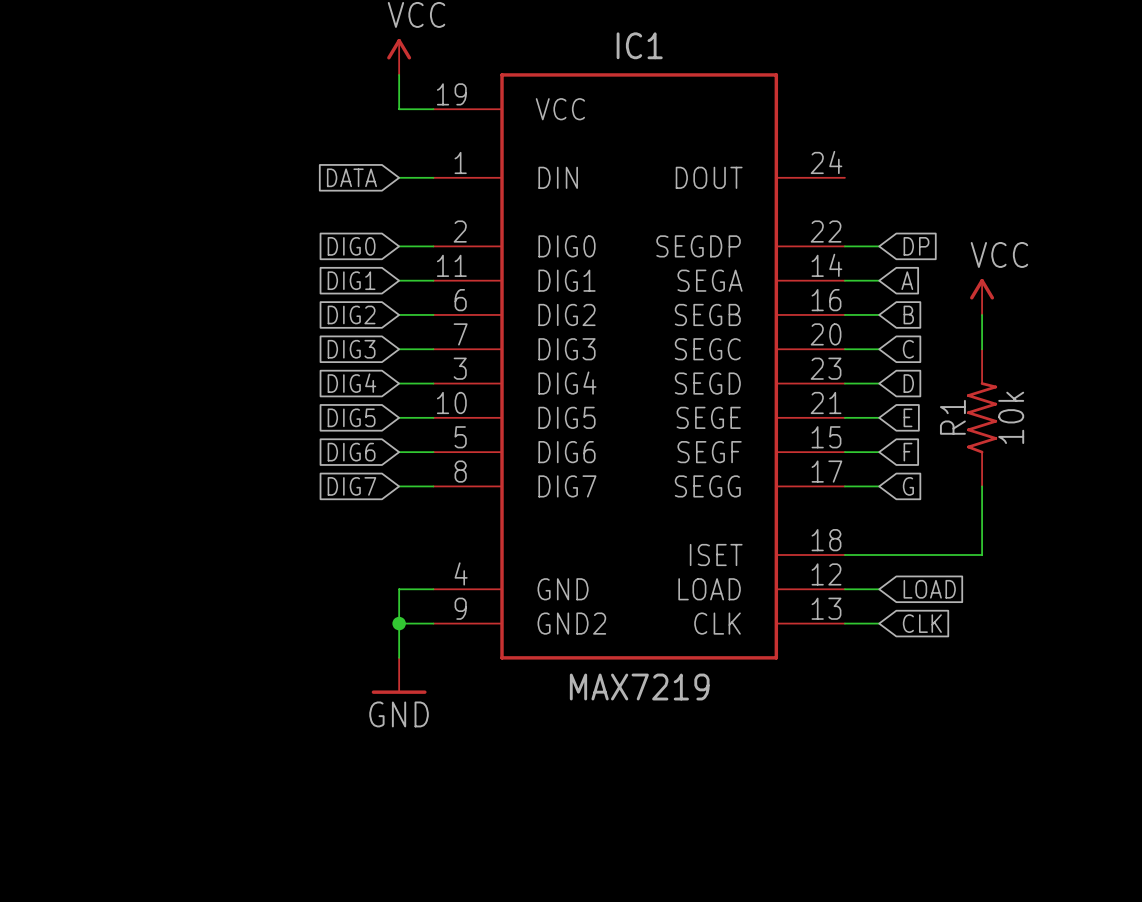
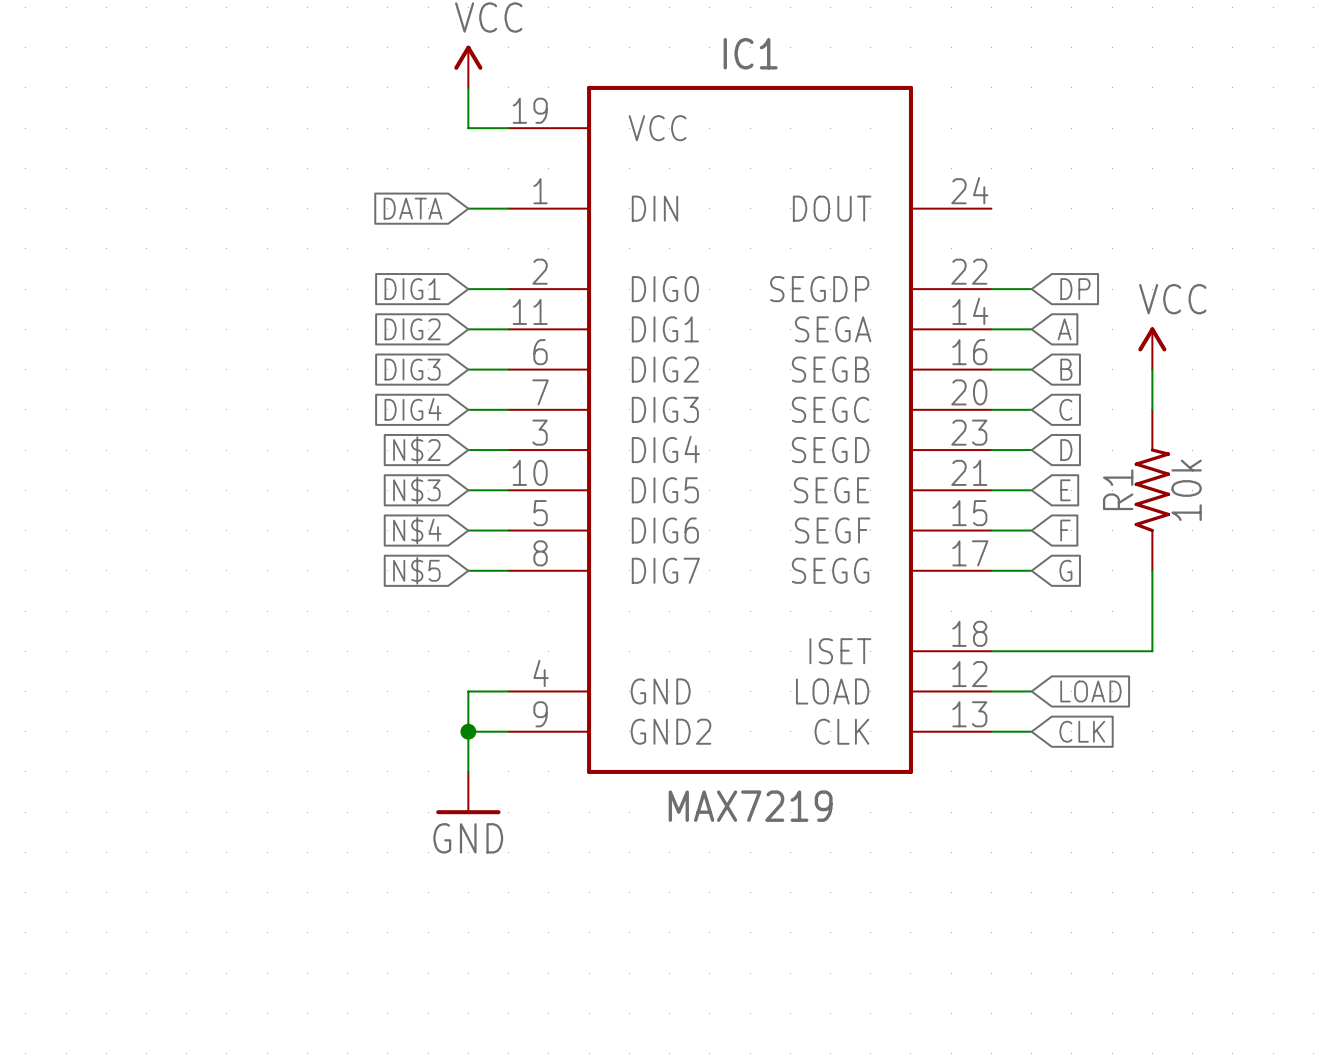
global label: DIG0 (351, 246) -> DIG1 (412, 289)
global label: DIG1 (351, 280) -> DIG2 (412, 329)
global label: DIG2 (351, 314) -> DIG3 (412, 369)
global label: DIG3 (351, 349) -> DIG4 (412, 409)
global label: DIG4 (351, 383) -> N$2 (416, 450)
global label: DIG5 (351, 417) -> N$3 (416, 490)
global label: DIG6 (351, 452) -> N$4 (417, 530)
global label: DIG7 (351, 486) -> N$5 (416, 570)

